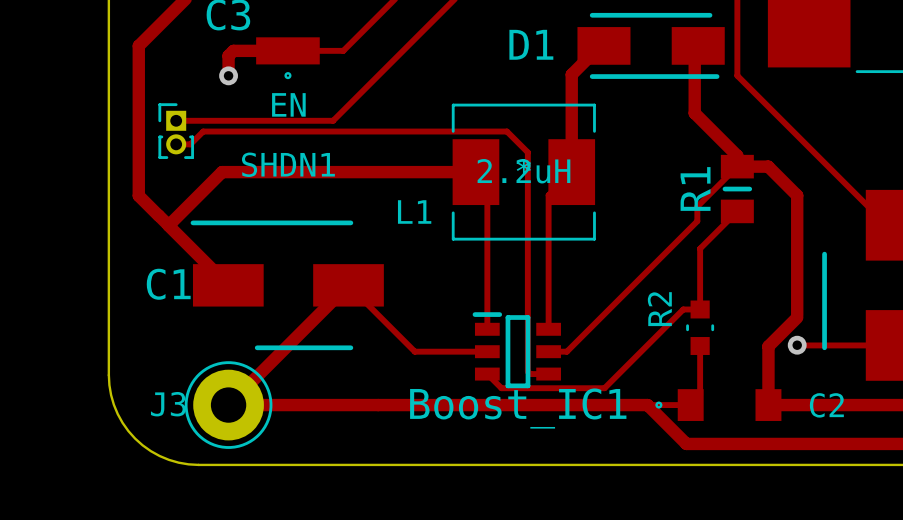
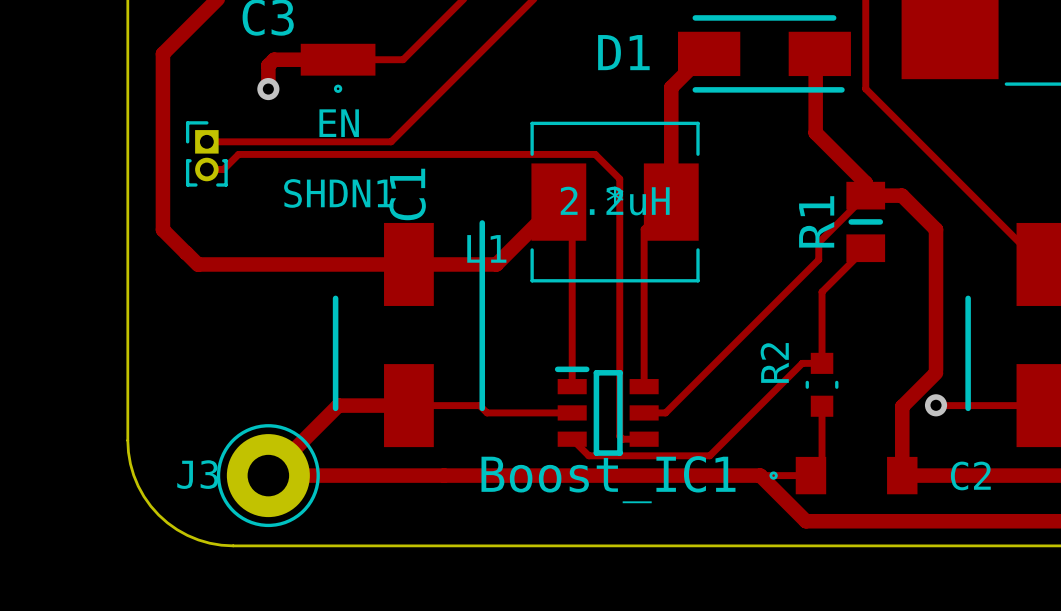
top track: (475, 172) (222, 172) (168, 225) -> (558, 202) (496, 264) (198, 264)
top track: (168, 225) (228, 285) -> none
C1 rotation: 0° (287, 285) -> 90° clockwise (408, 333)
top track: (348, 285) (288, 345) -> (479, 405) (338, 405)
top track: (348, 285) (408, 345) -> none

